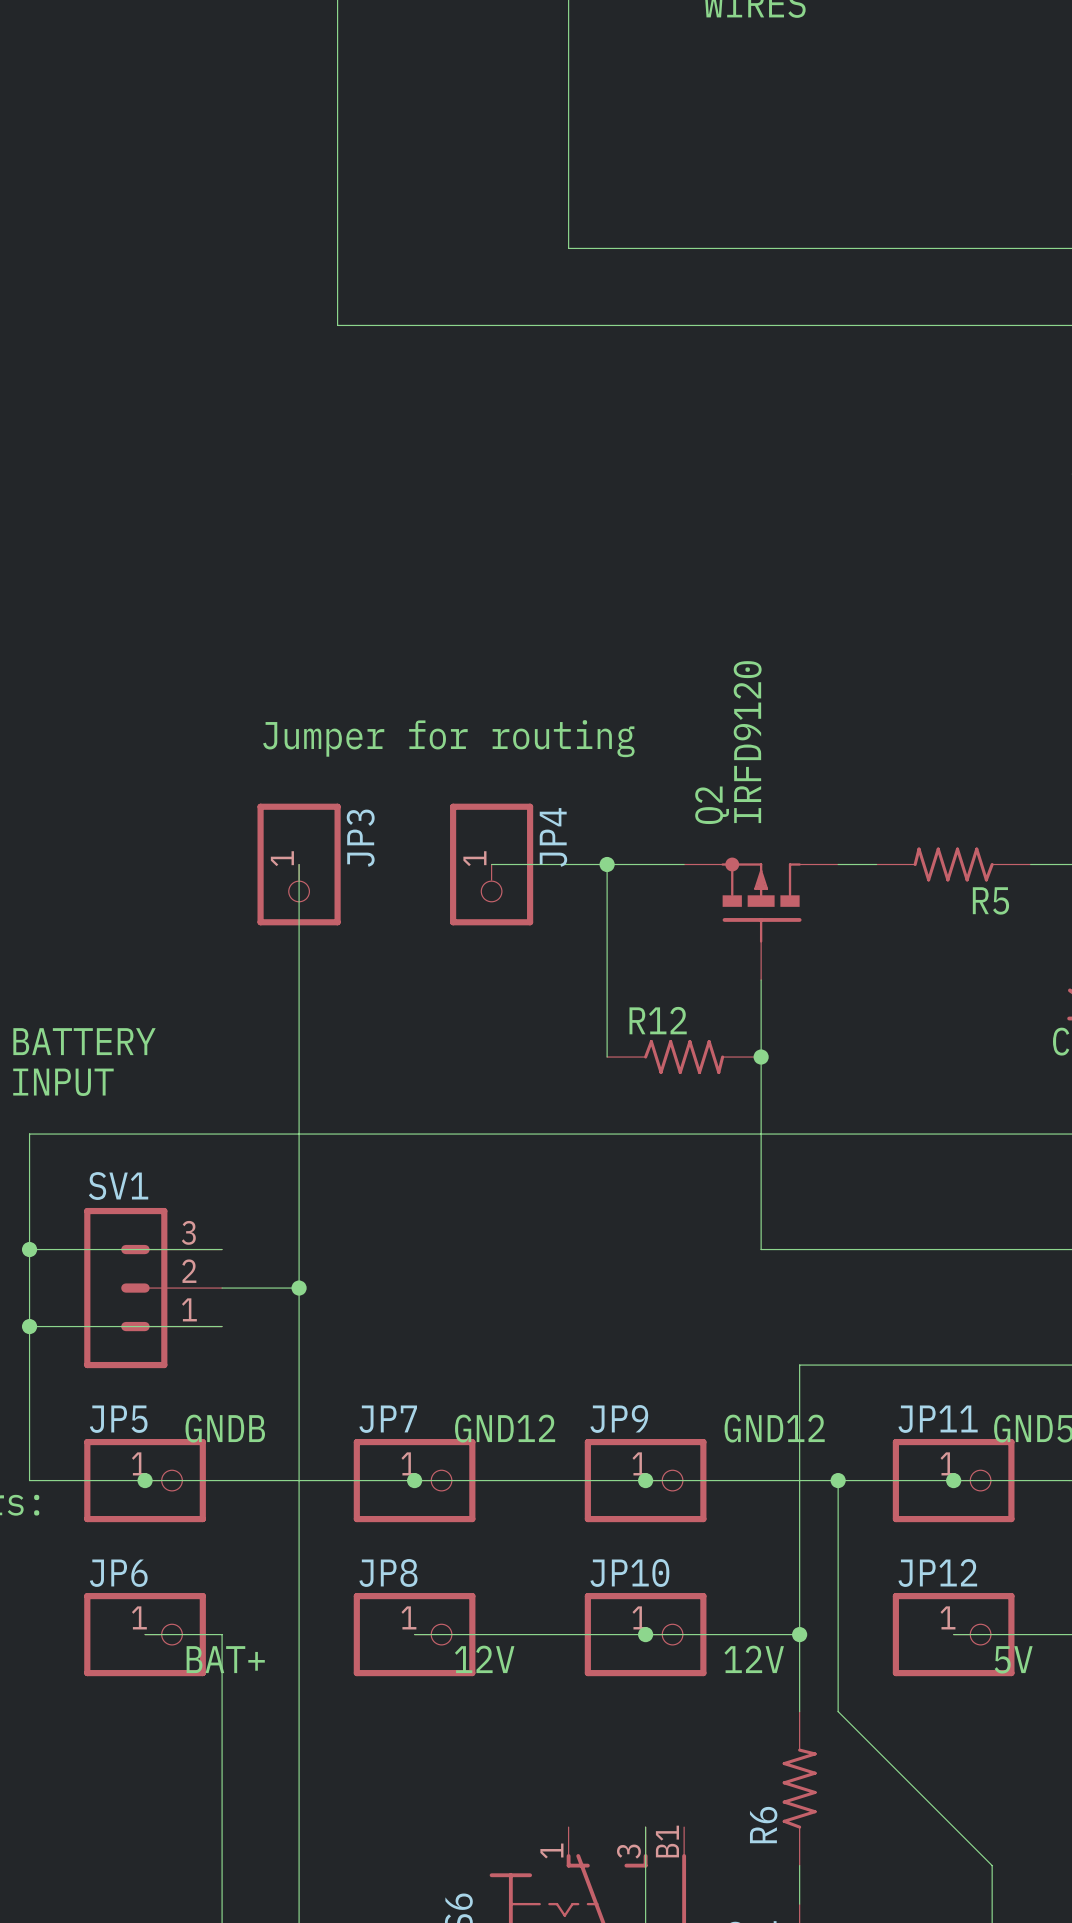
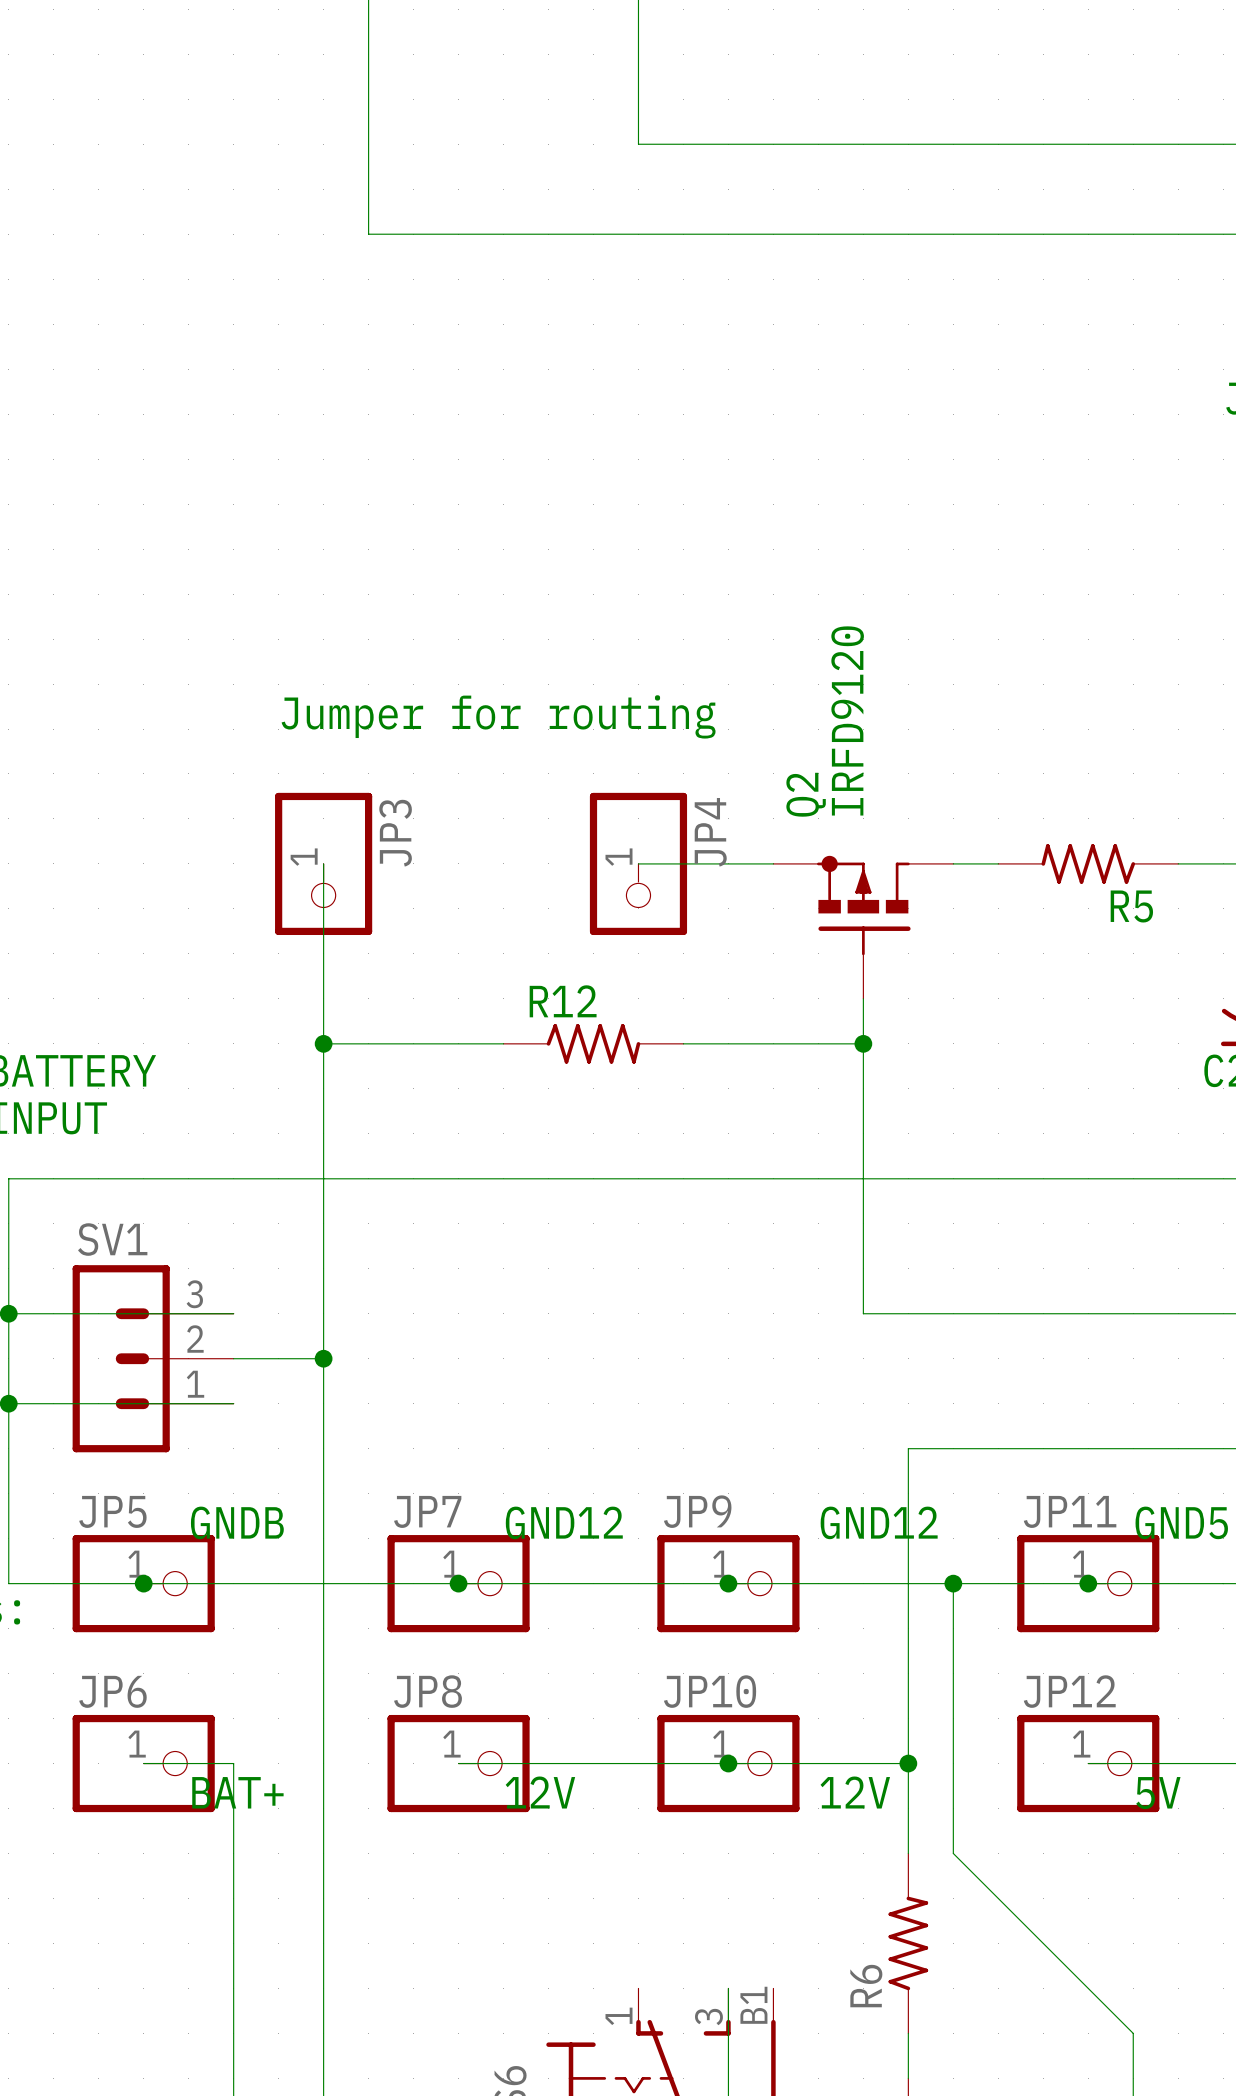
wire: (491, 864) (568, 864) -> none
JP4 position: (491, 864) -> (638, 863)
wire: (607, 864) (607, 1057) -> none
junction: (607, 864) -> none
wire: none -> (323, 1043) (503, 1043)
junction: none -> (323, 1043)
wire: none -> (683, 1043) (863, 1043)
R12 position: (684, 1057) -> (593, 1043)
junction position: (761, 1057) -> (863, 1043)

